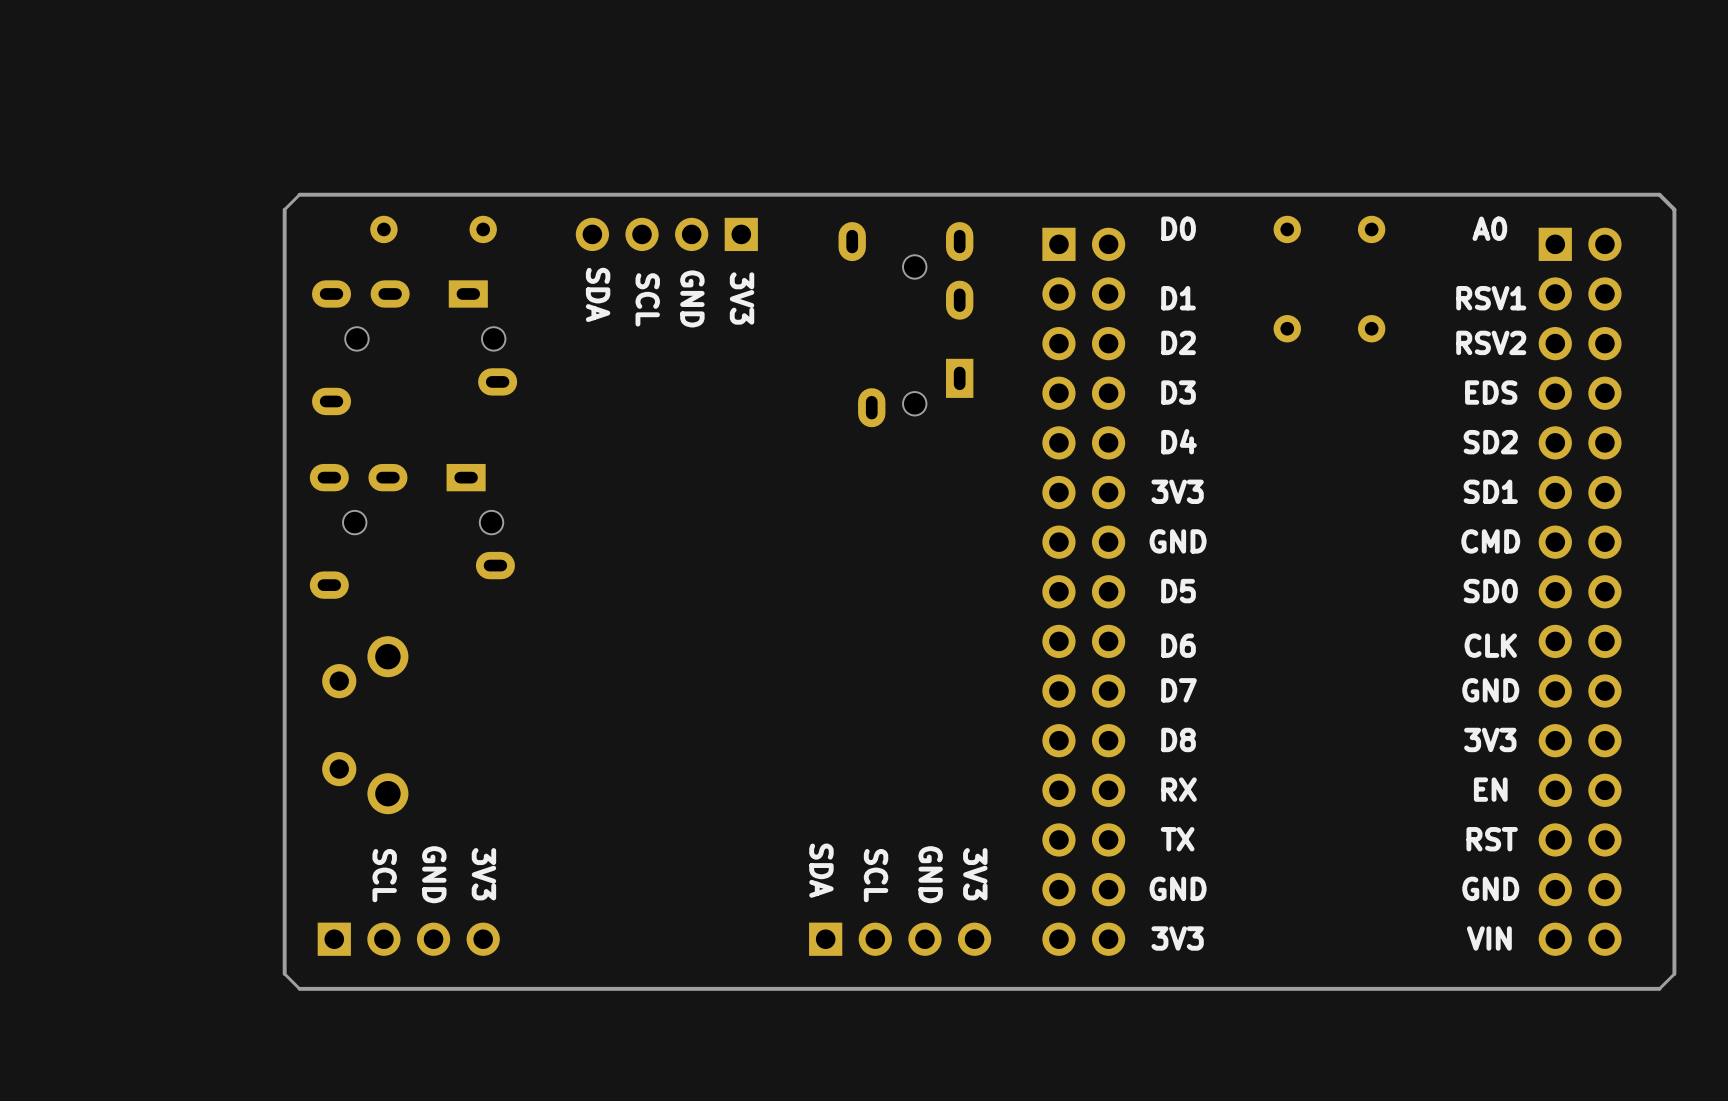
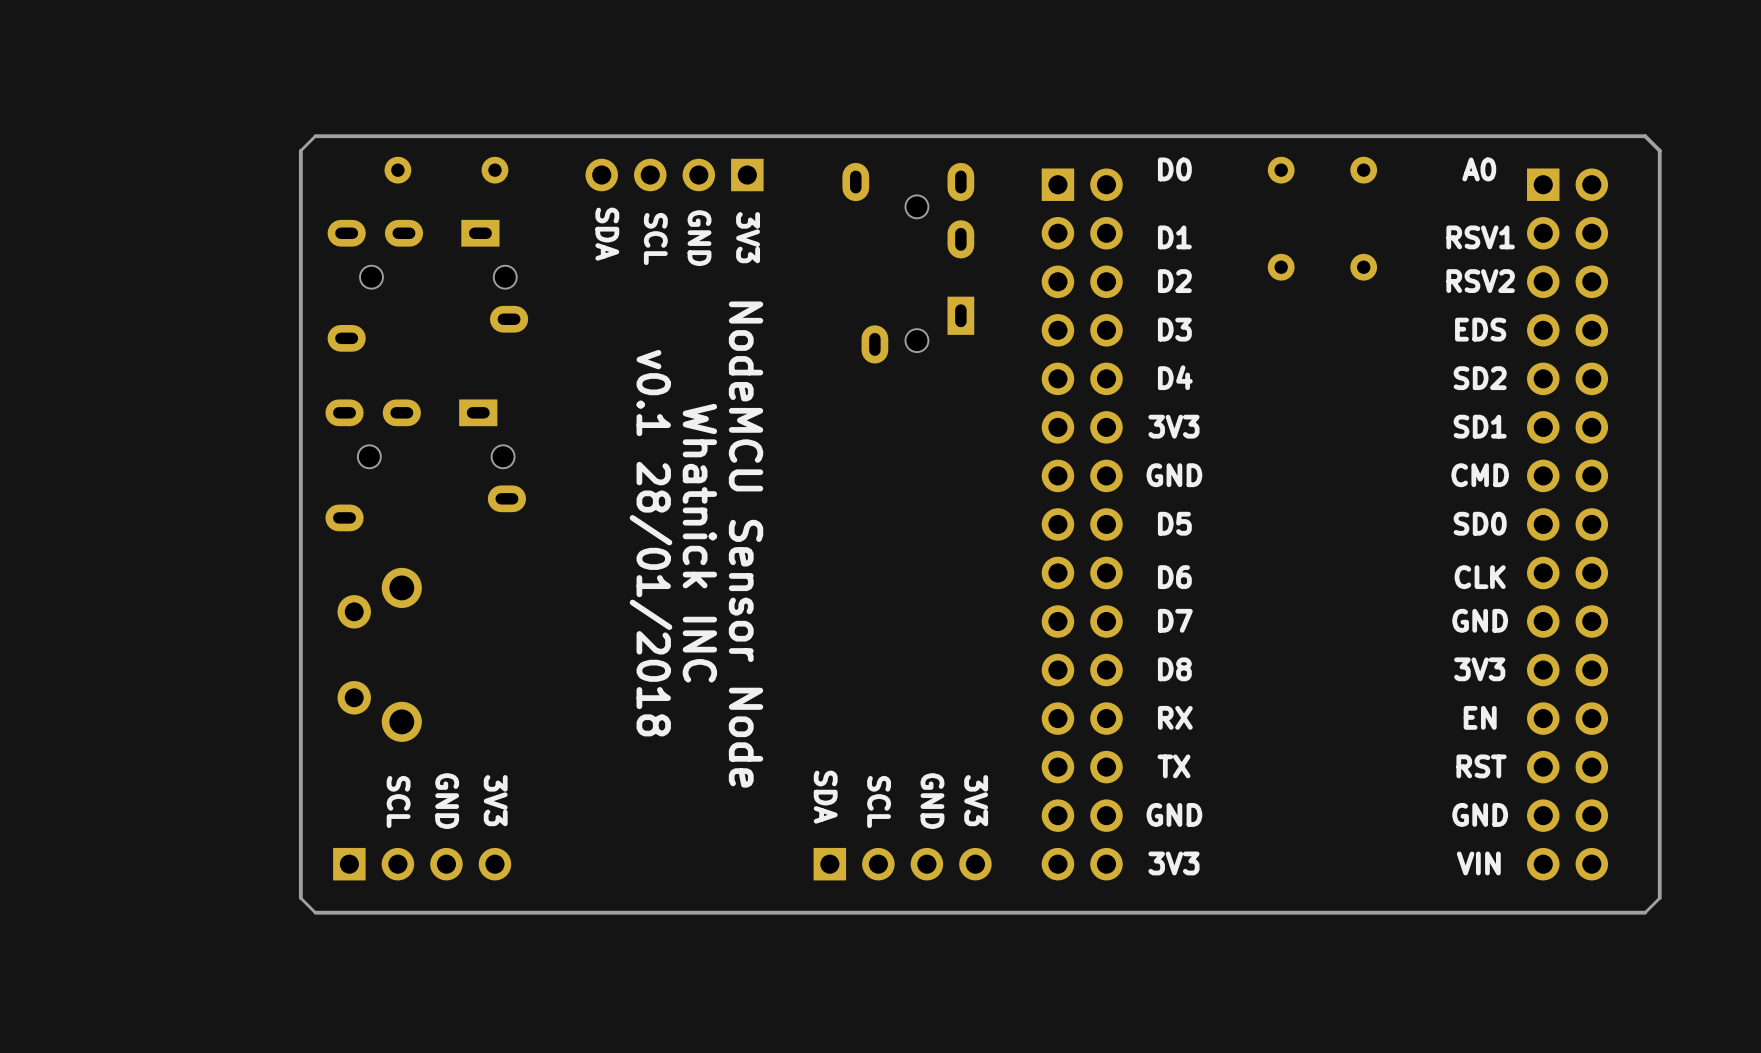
text: none -> v0.1 28/01/2018 (651, 543)
text: none -> Whatnick INC (699, 543)
text: none -> NodeMCU Sensor Node (746, 544)

